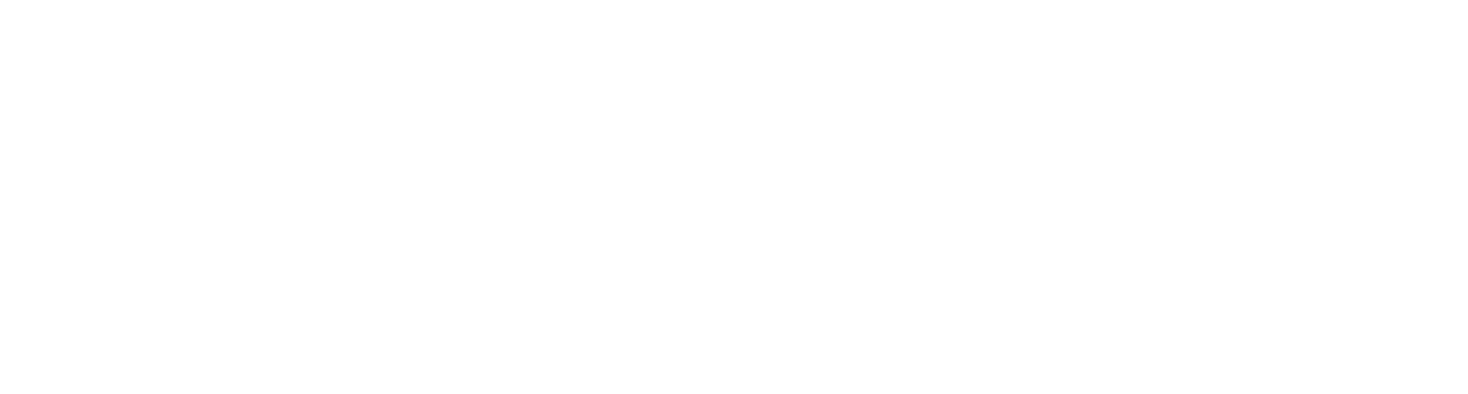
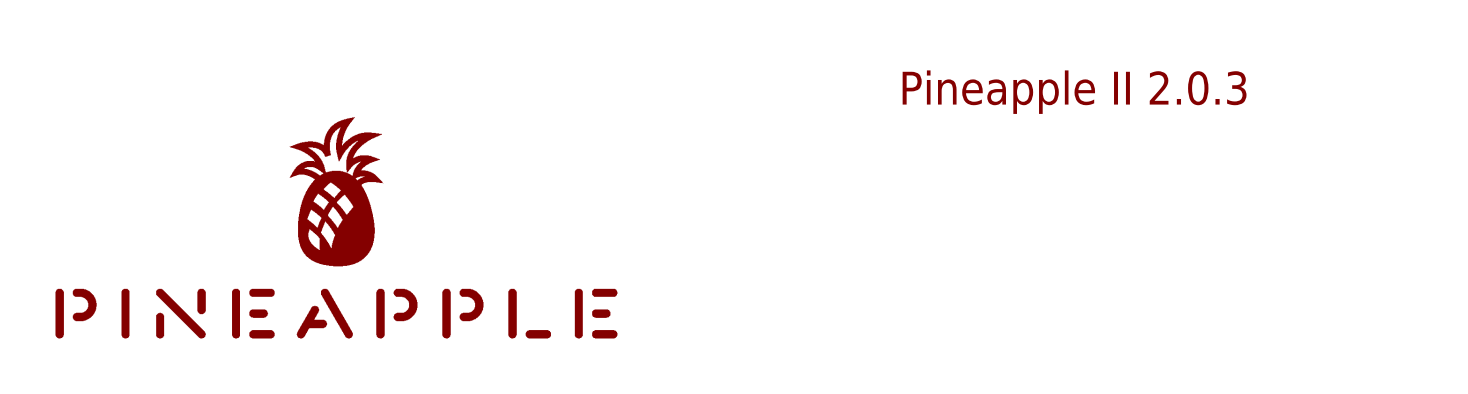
text: none -> Pineapple II 2.0.3 (1074, 92)
part: none -> (336, 227)

